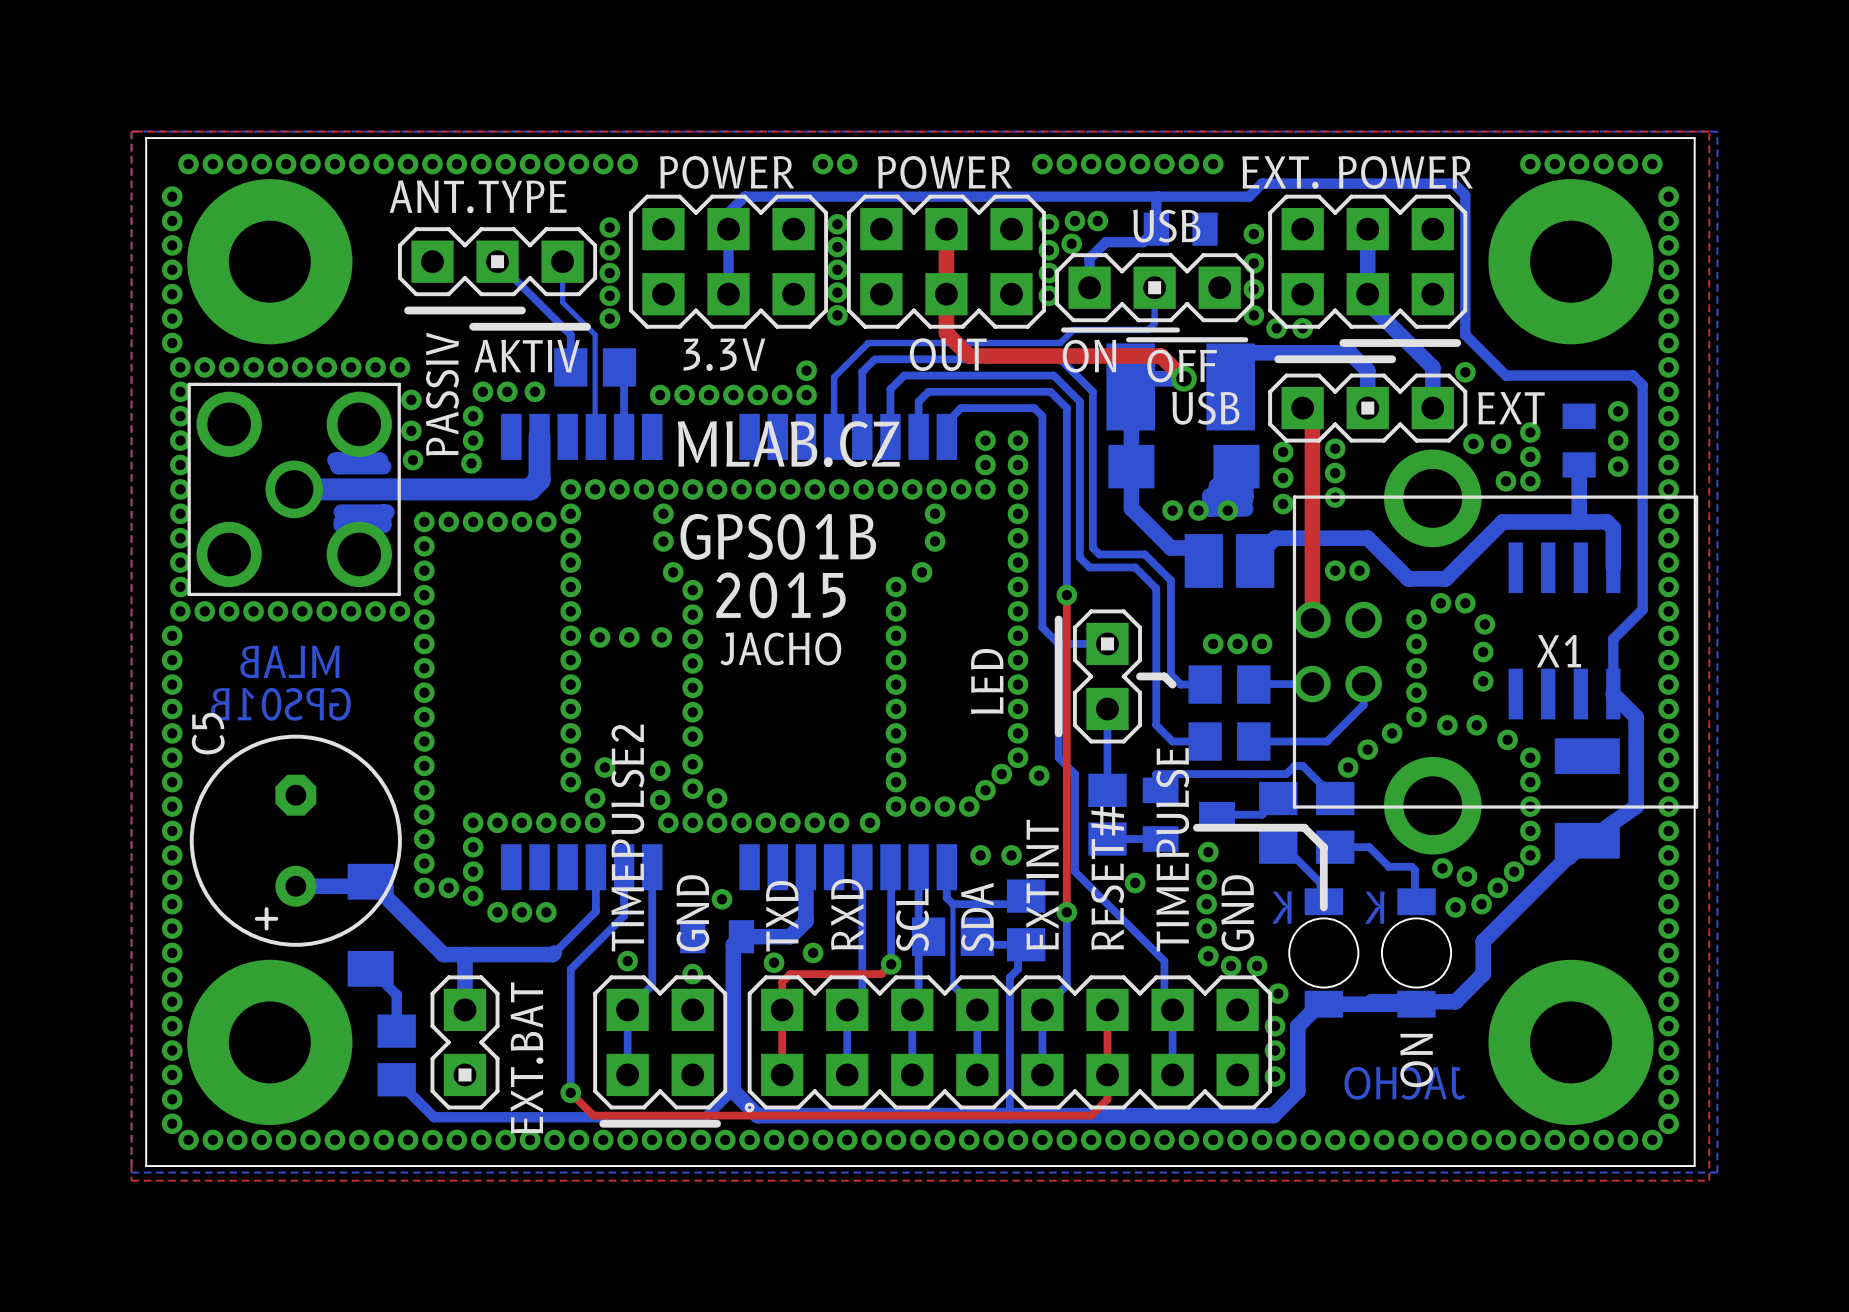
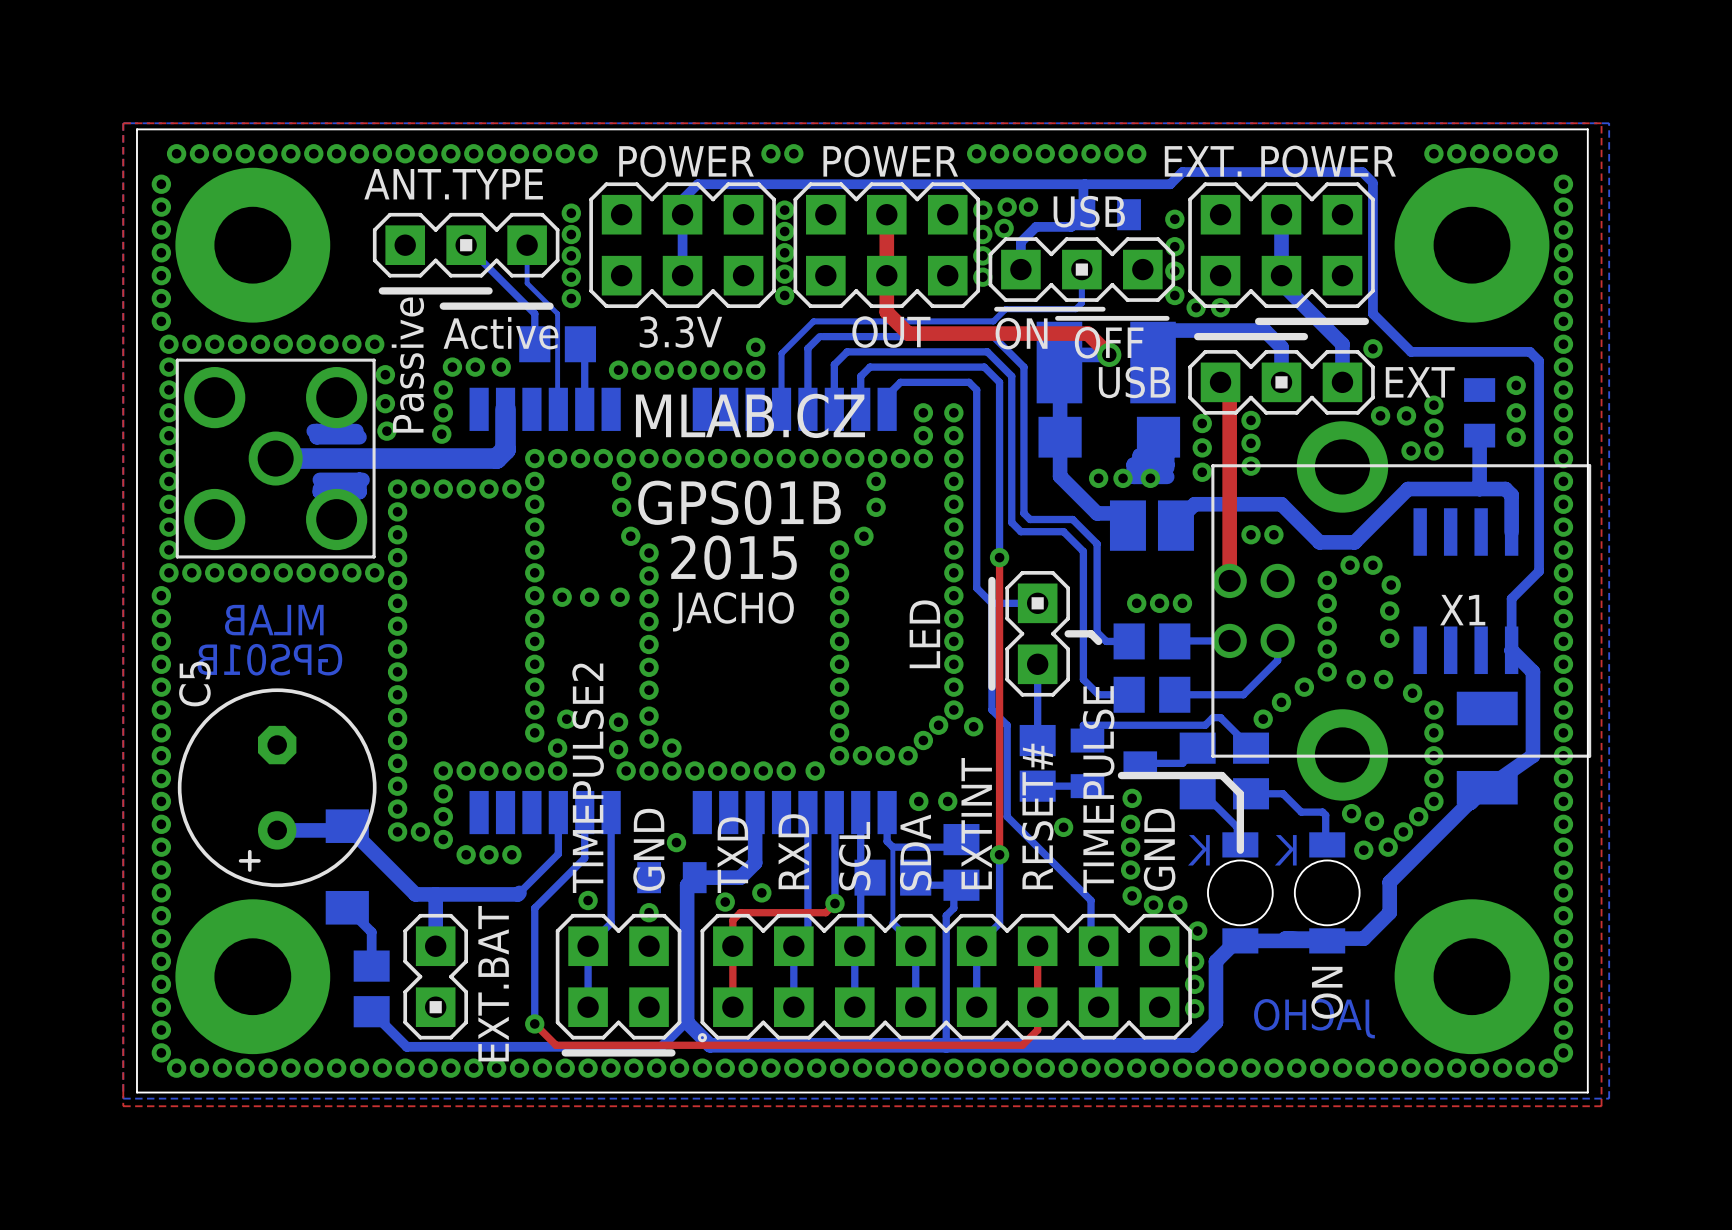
text: AKTIV (527, 356) -> Active (500, 333)
text: PASSIV (442, 394) -> Passive (407, 365)

